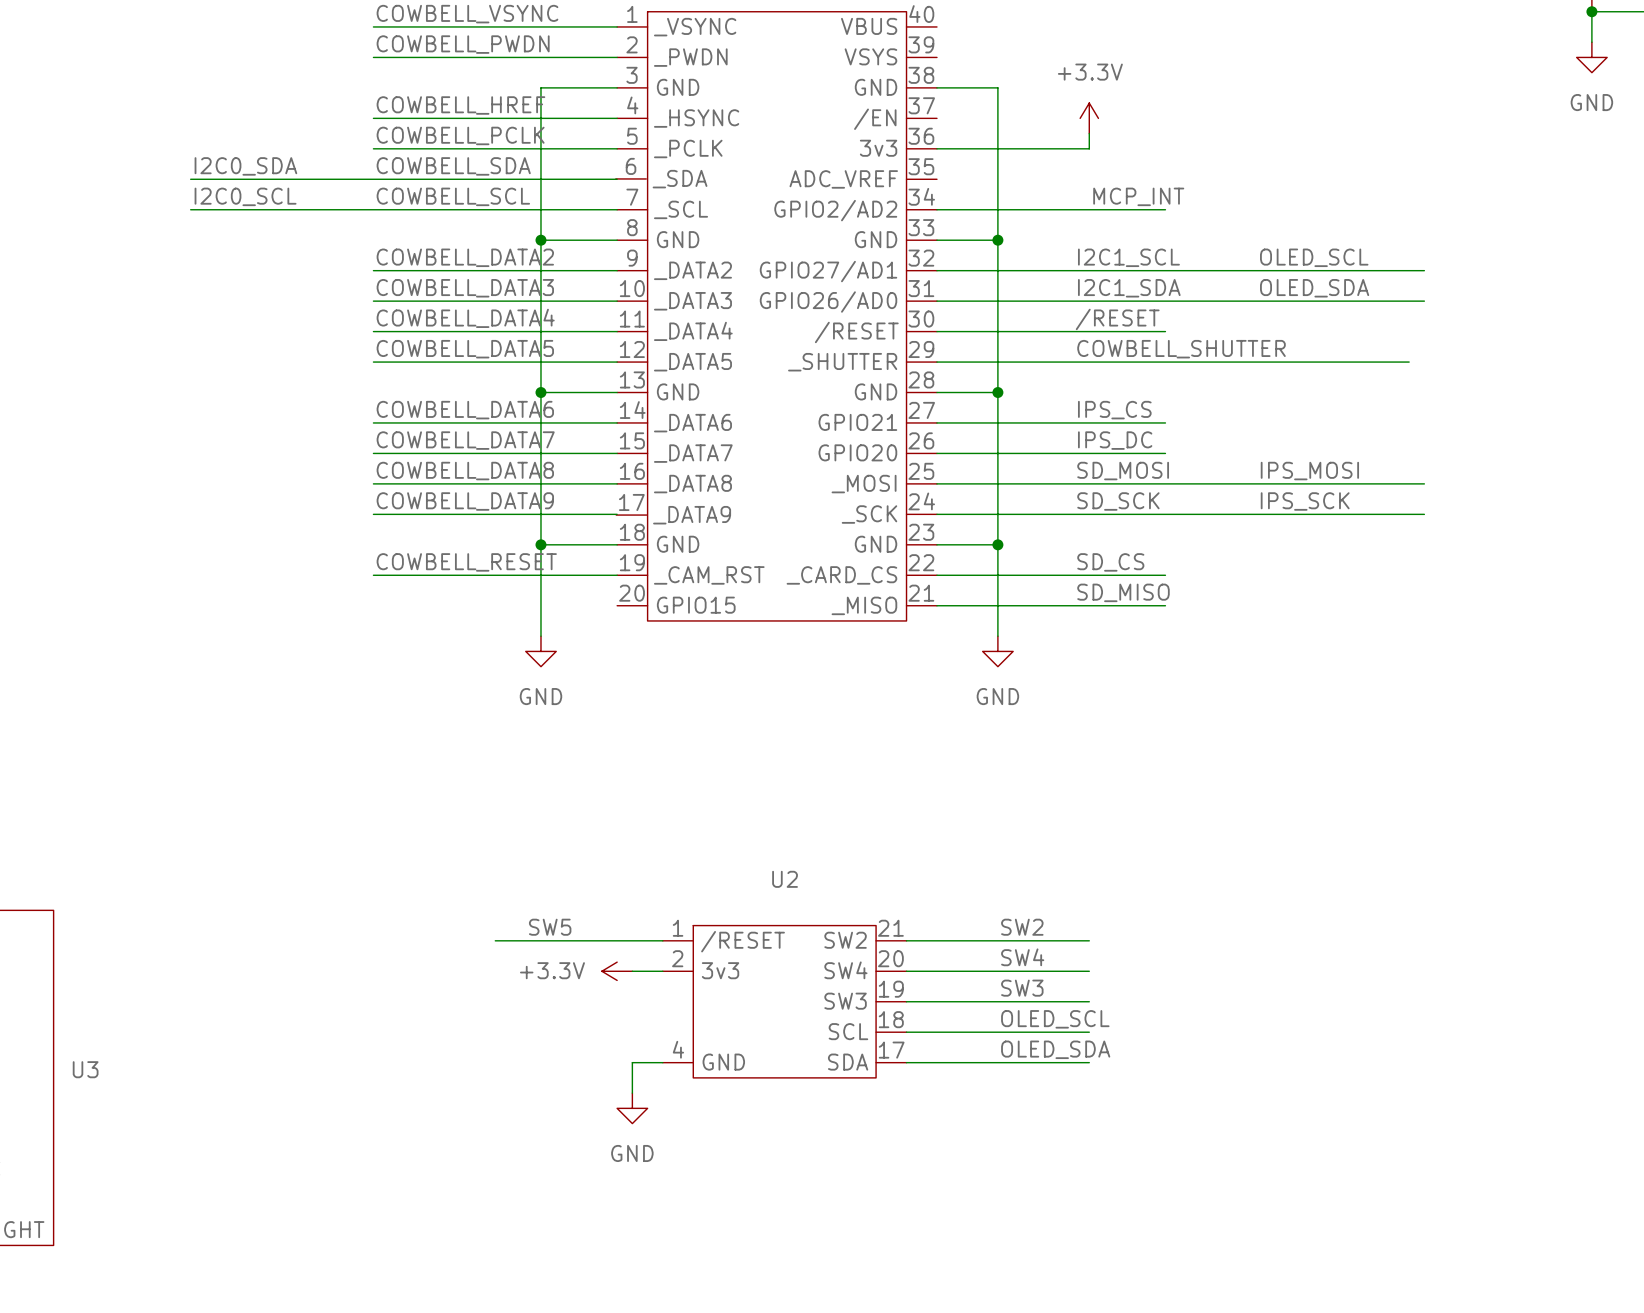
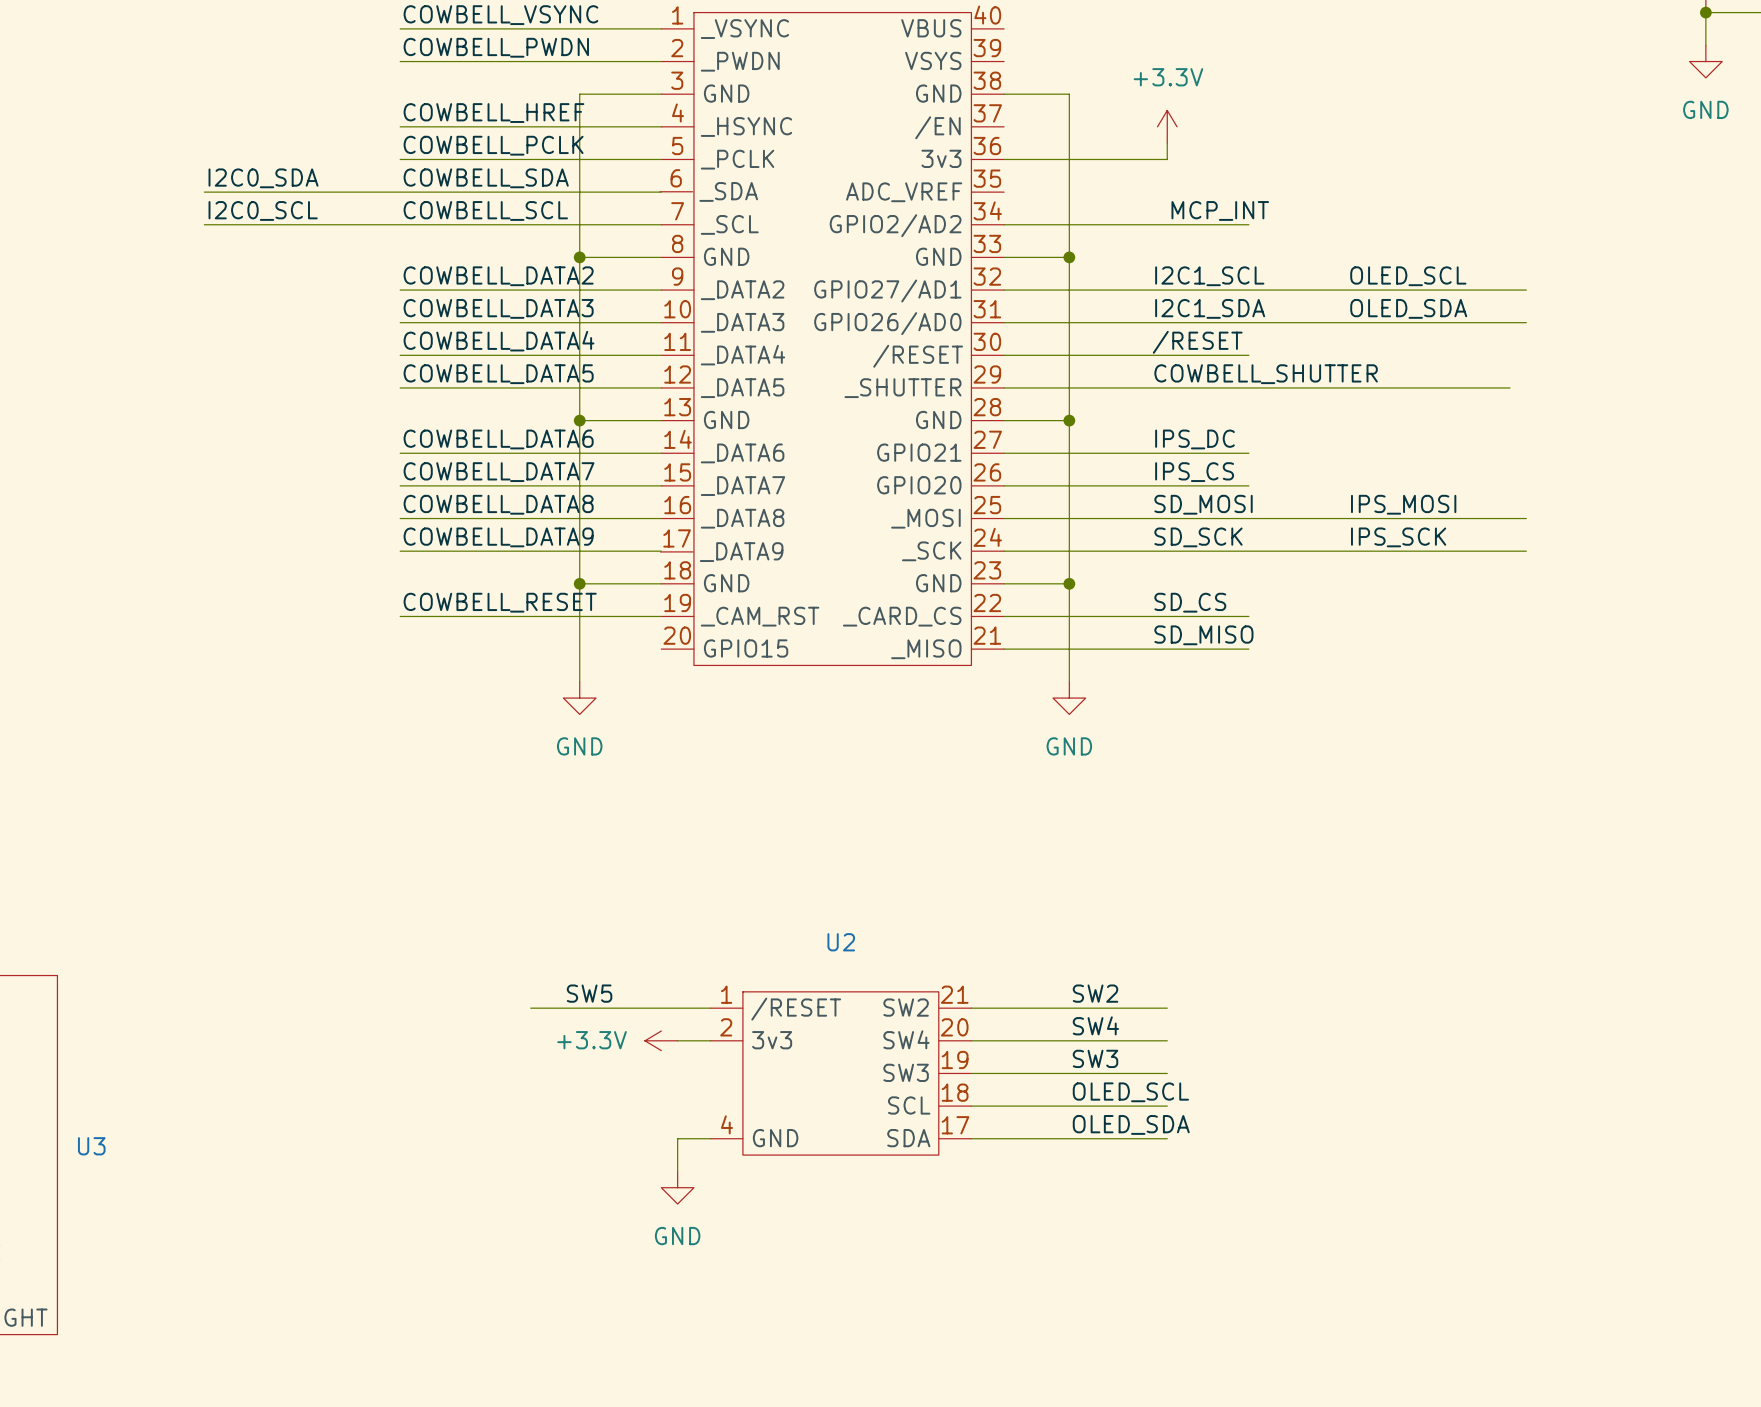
label: IPS_CS (1114, 410) -> IPS_DC (1194, 439)
label: IPS_DC (1115, 440) -> IPS_CS (1194, 472)

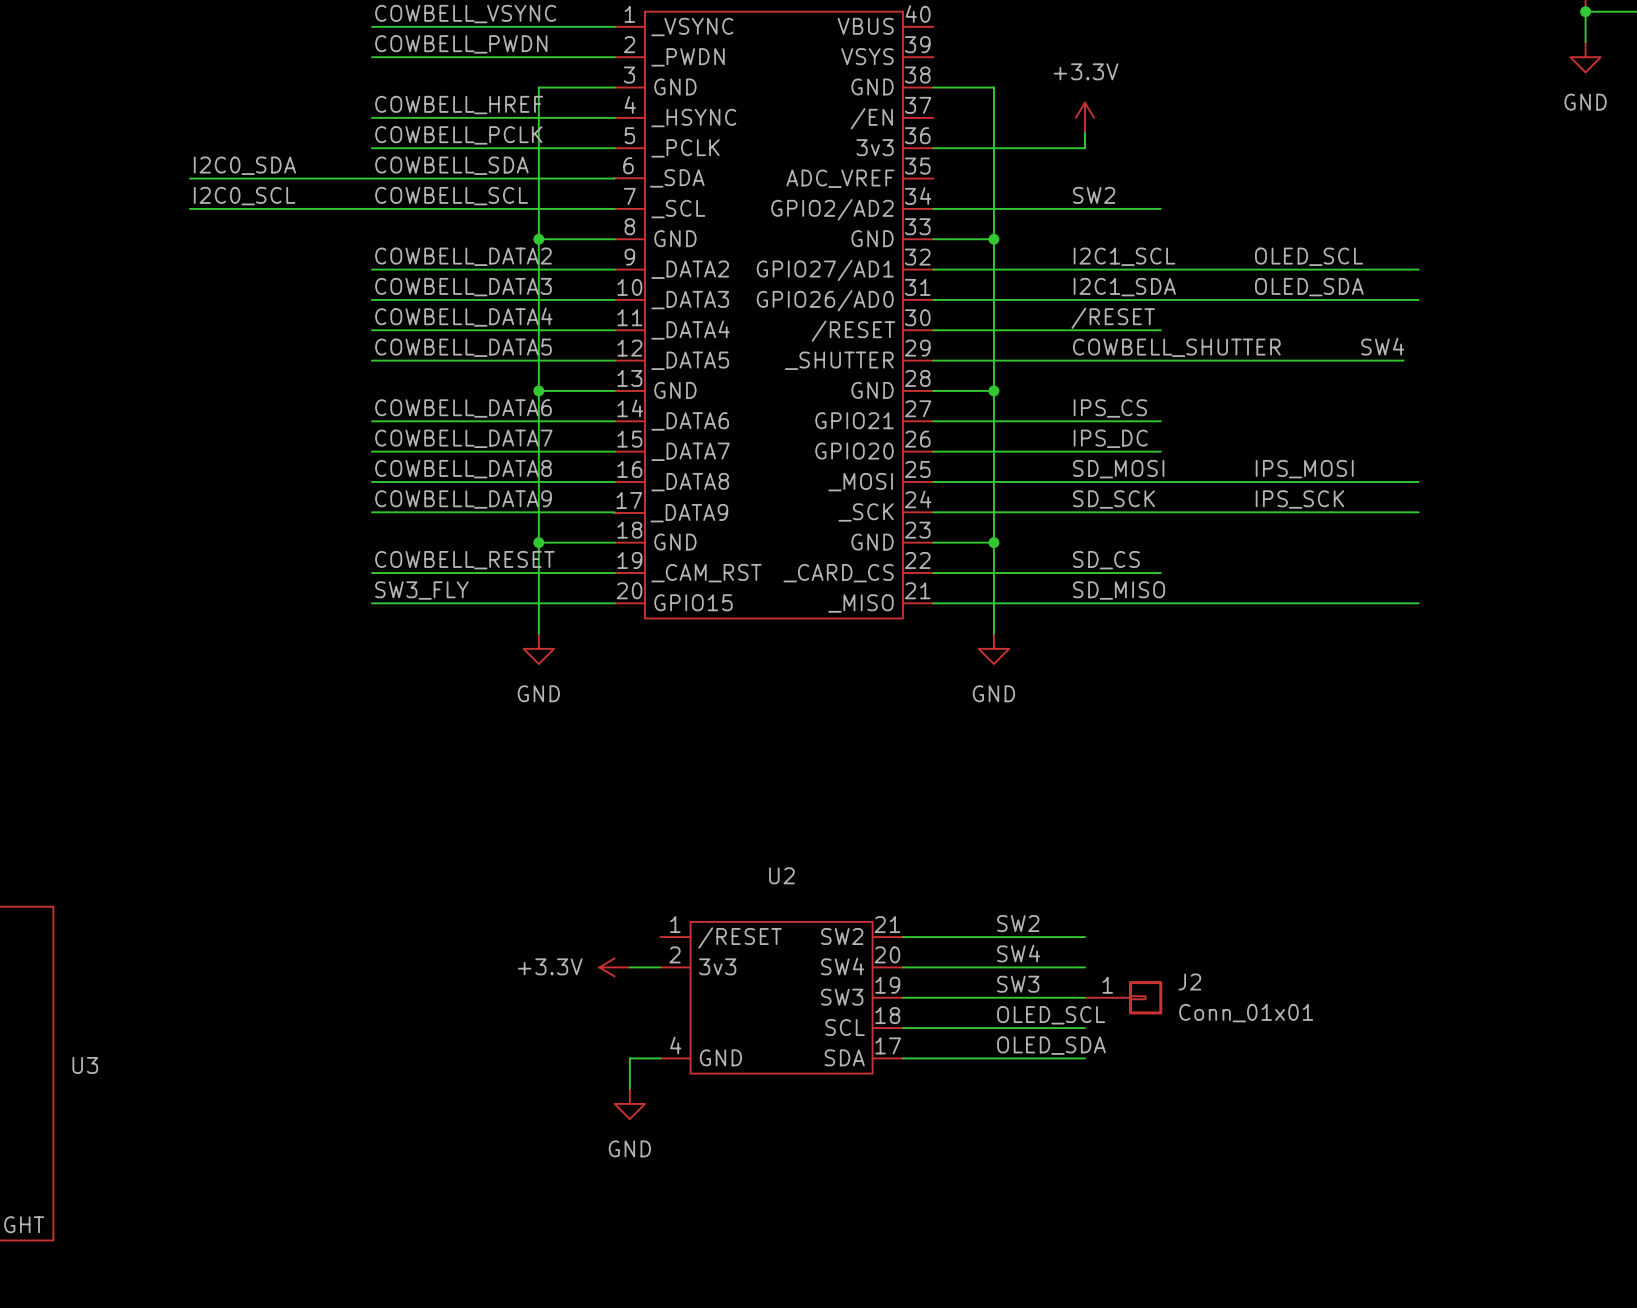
label: none -> SW2 (1094, 195)
label: MCP_INT (1220, 210) -> none
label: none -> SW4 (1382, 346)
label: IPS_DC (1194, 439) -> IPS_CS (1110, 408)
label: IPS_CS (1194, 472) -> IPS_DC (1110, 438)
label: none -> SW3_FLY (421, 590)
wire: none -> (371, 603) (614, 603)
wire: none -> (1160, 603) (1418, 603)
label: SW5 (589, 993) -> none
wire: (530, 1008) (710, 1008) -> none
J2: none -> Conn_01x01 (1123, 997)

